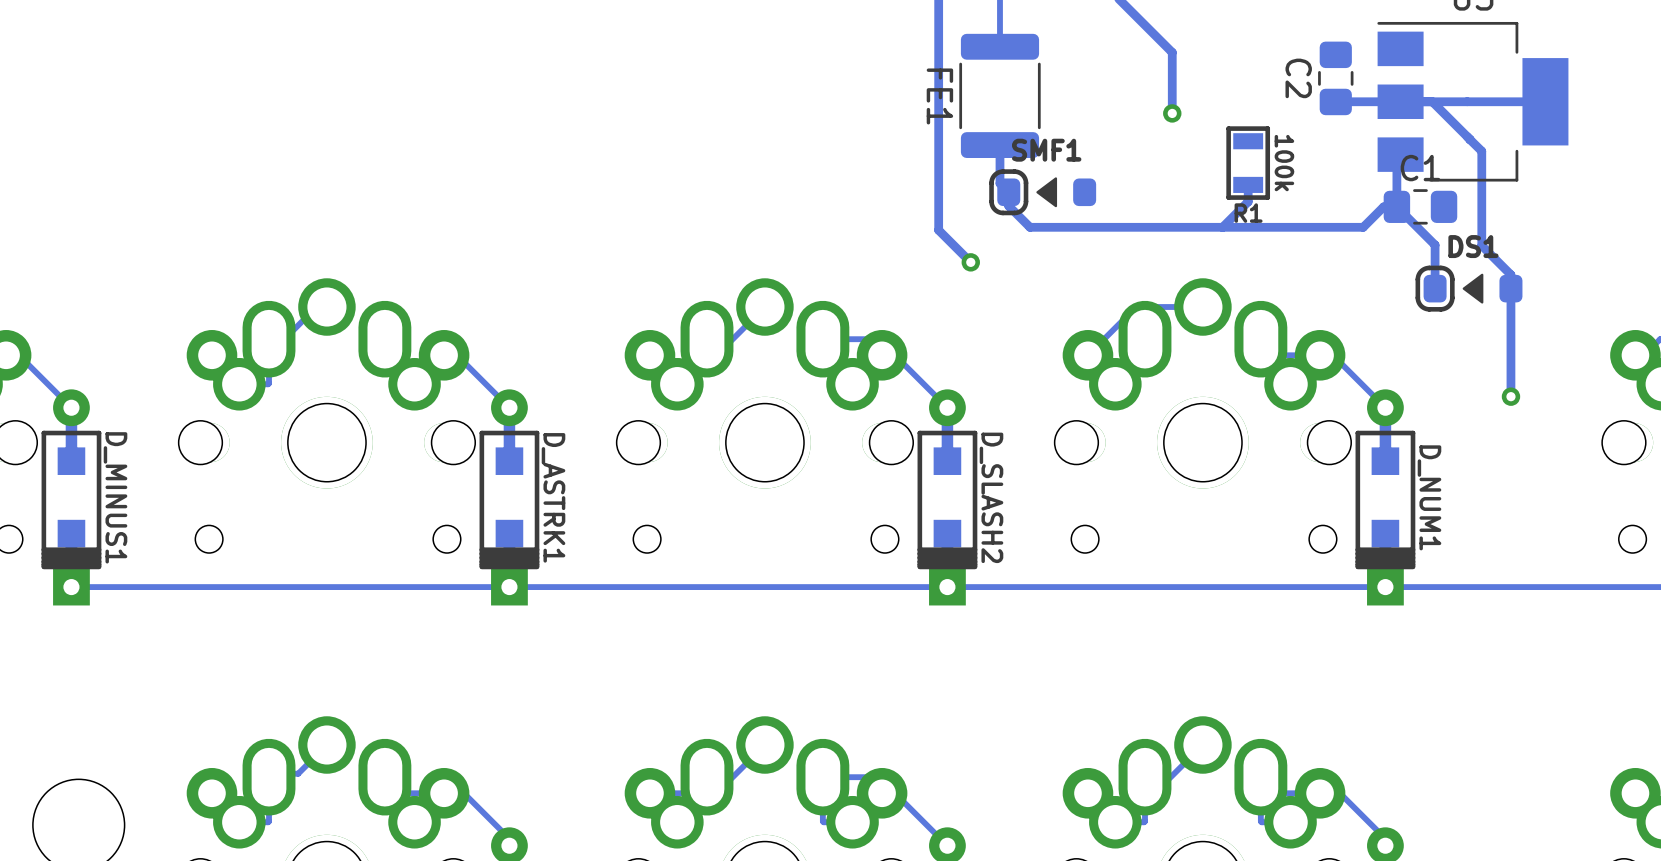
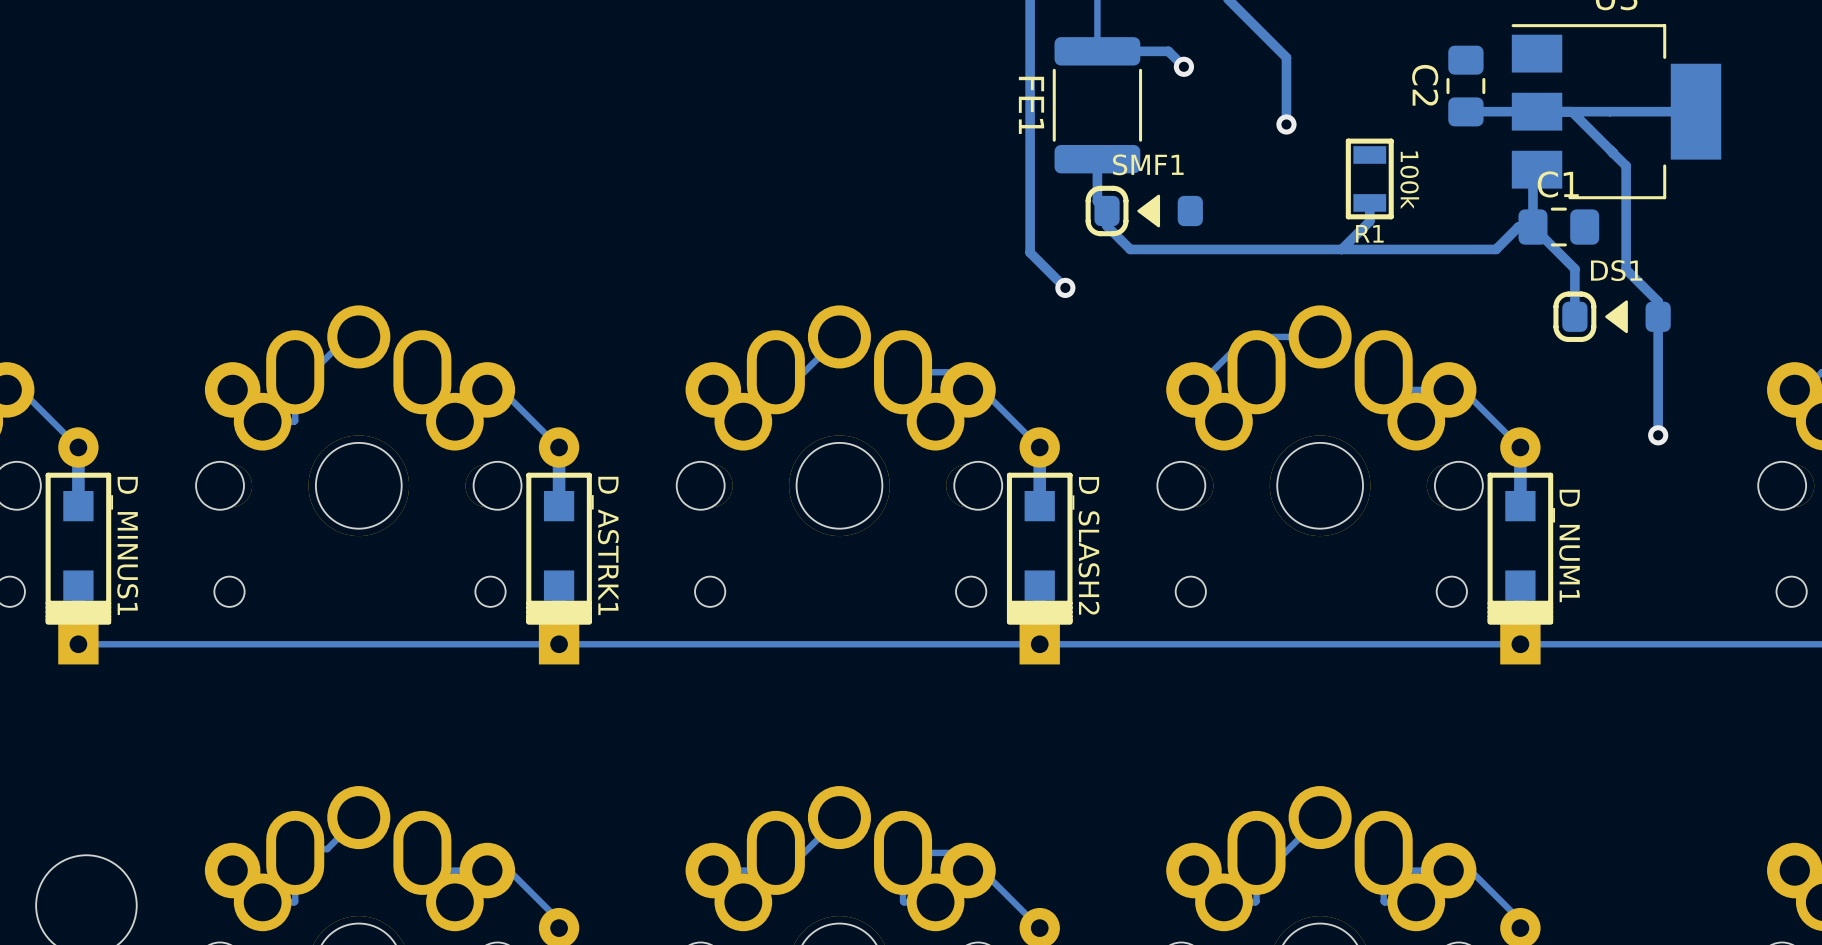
track: none -> (1097, 51) (1168, 51) (1183, 66)
via: none -> (1183, 66)

